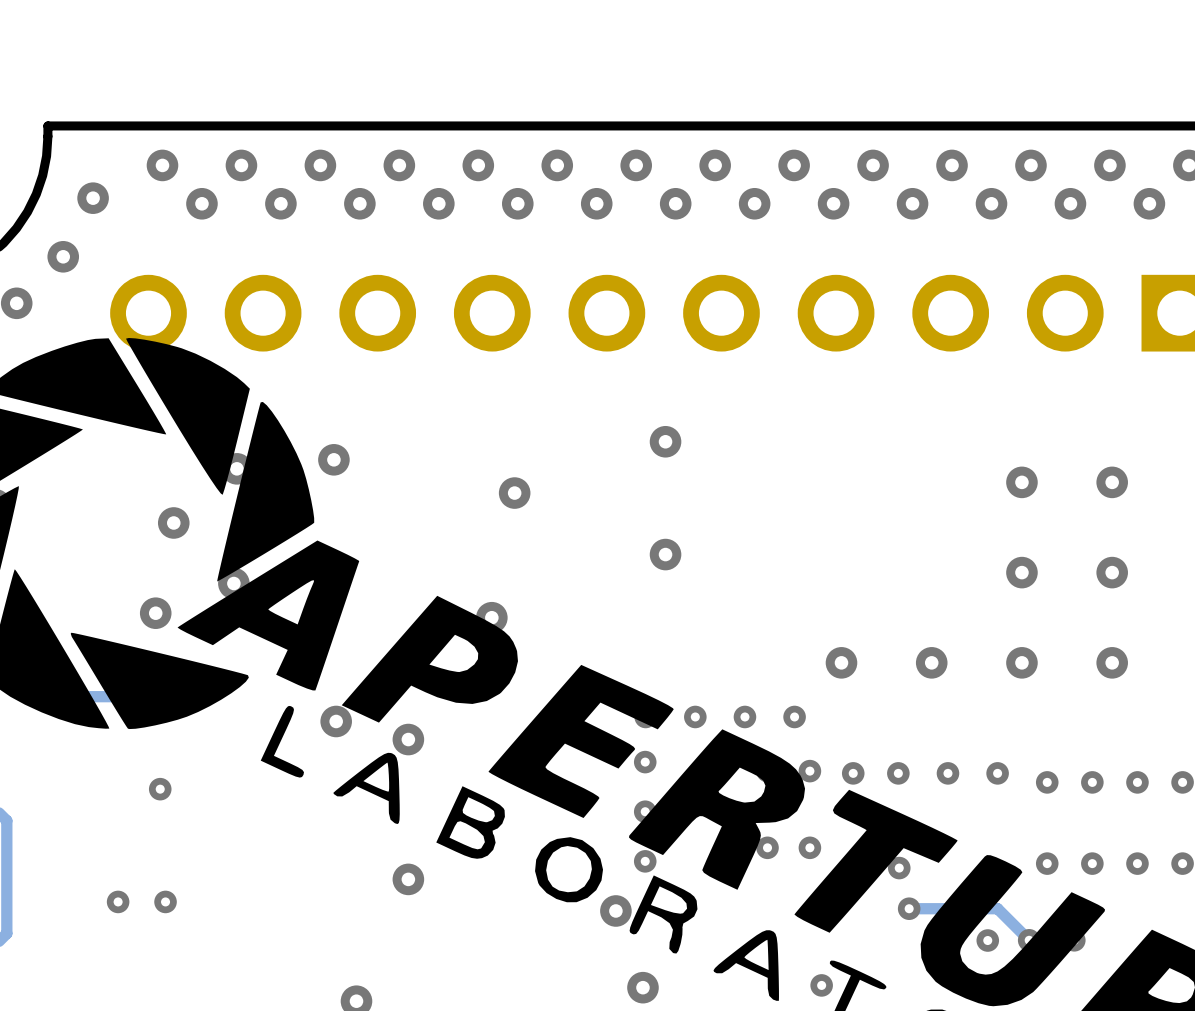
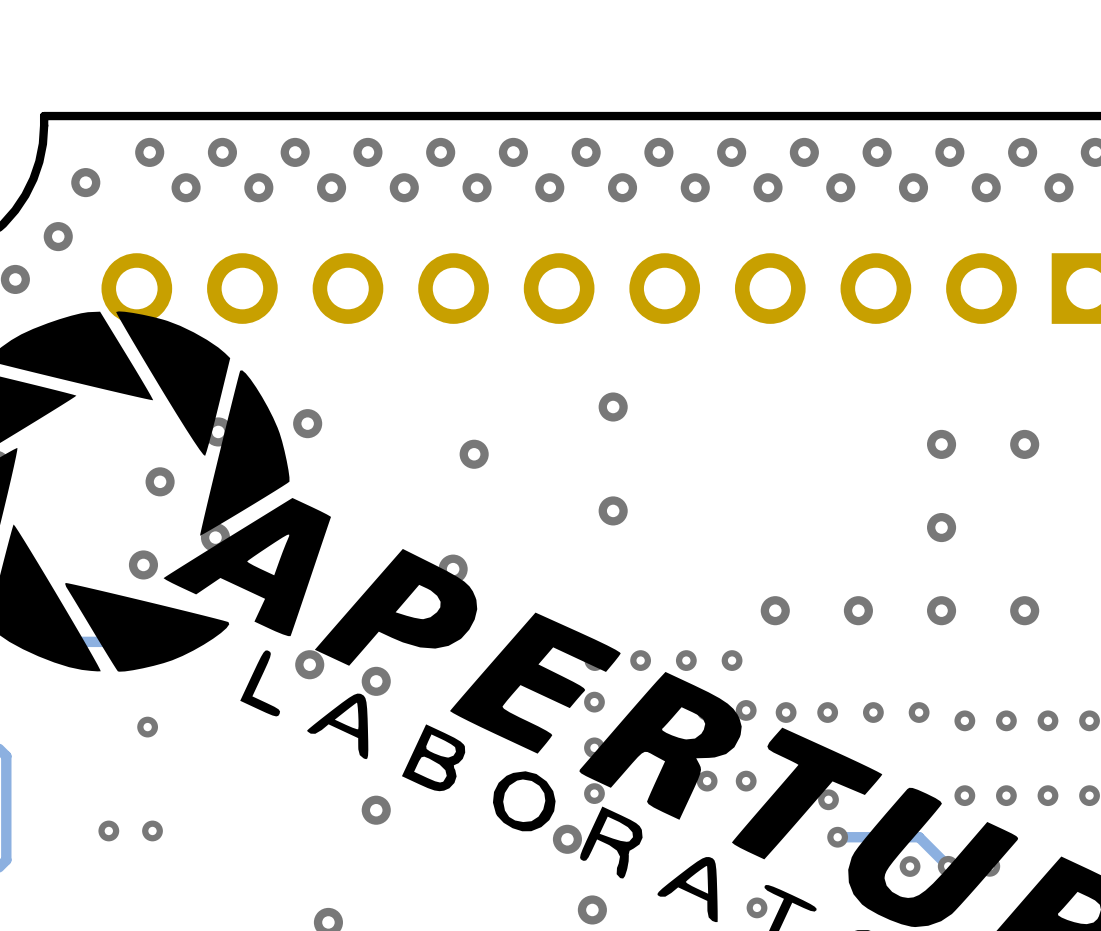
via: (1112, 572) -> none

